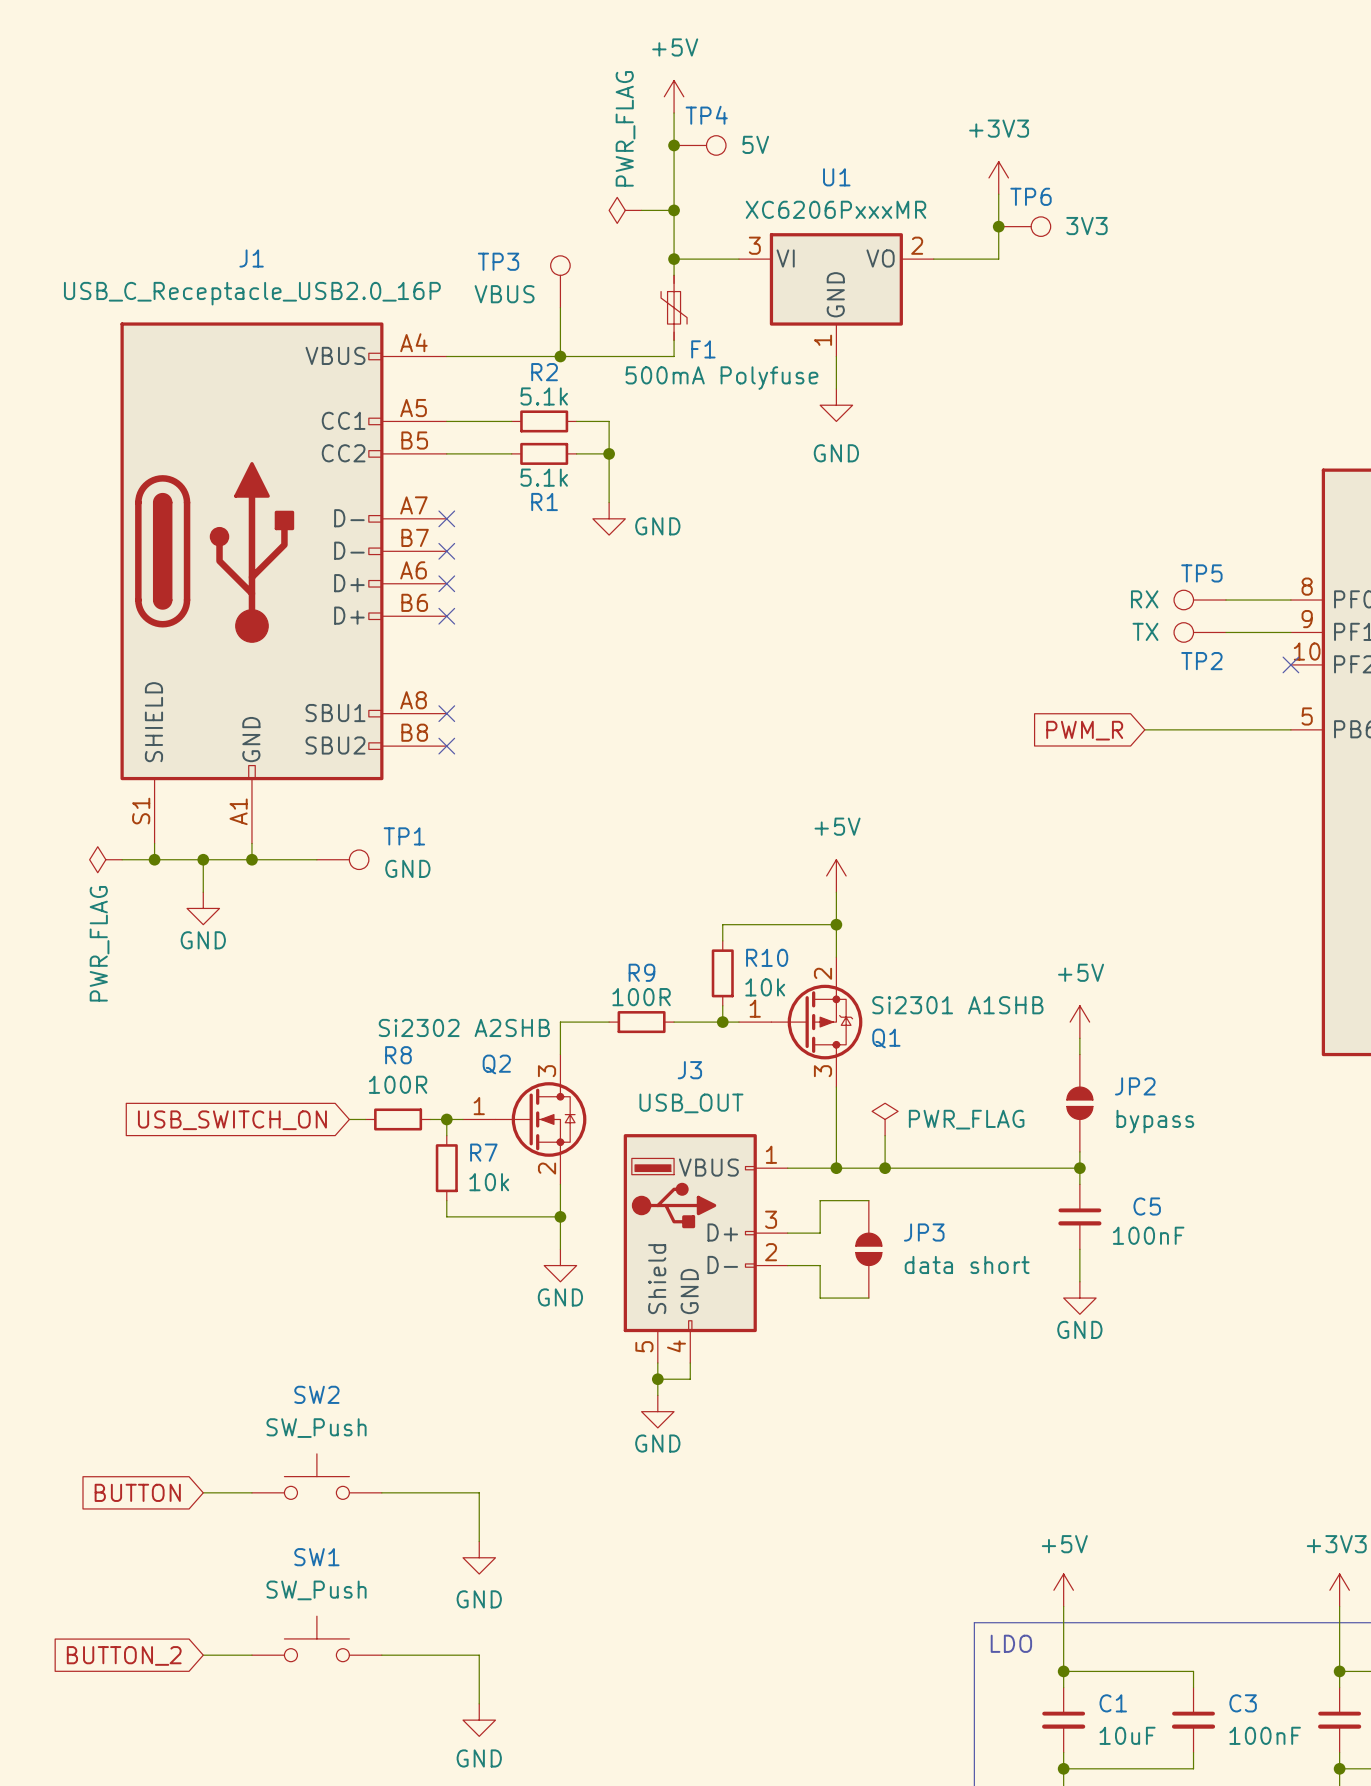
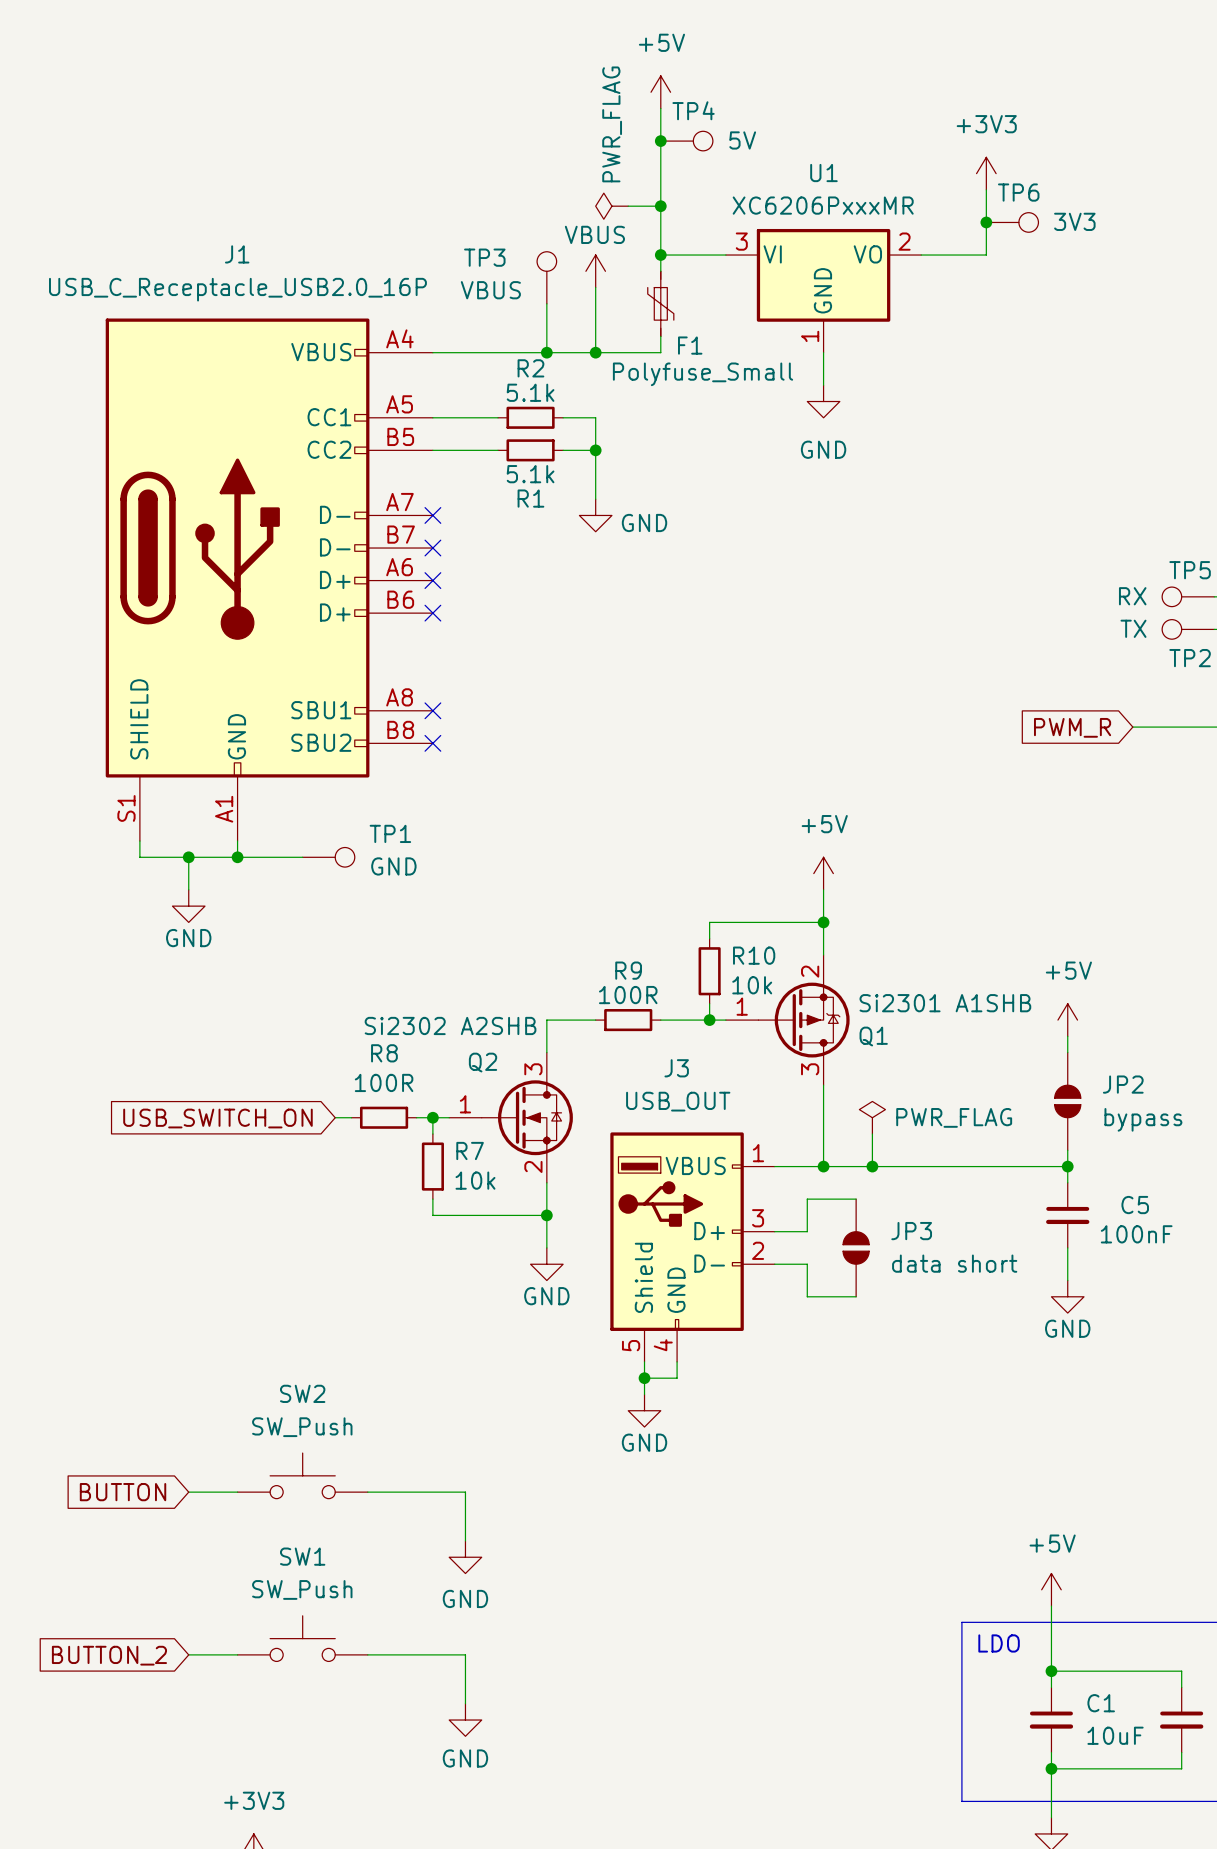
power symbol: none -> VBUS (595, 271)
wire: none -> (595, 287) (595, 352)
junction: none -> (595, 352)
F1 value: 500mA Polyfuse (721, 378) -> Polyfuse_Small (703, 374)
power symbol: PWR_FLAG (105, 859) -> none
wire: (122, 859) (154, 859) -> none
junction: (154, 859) -> none

